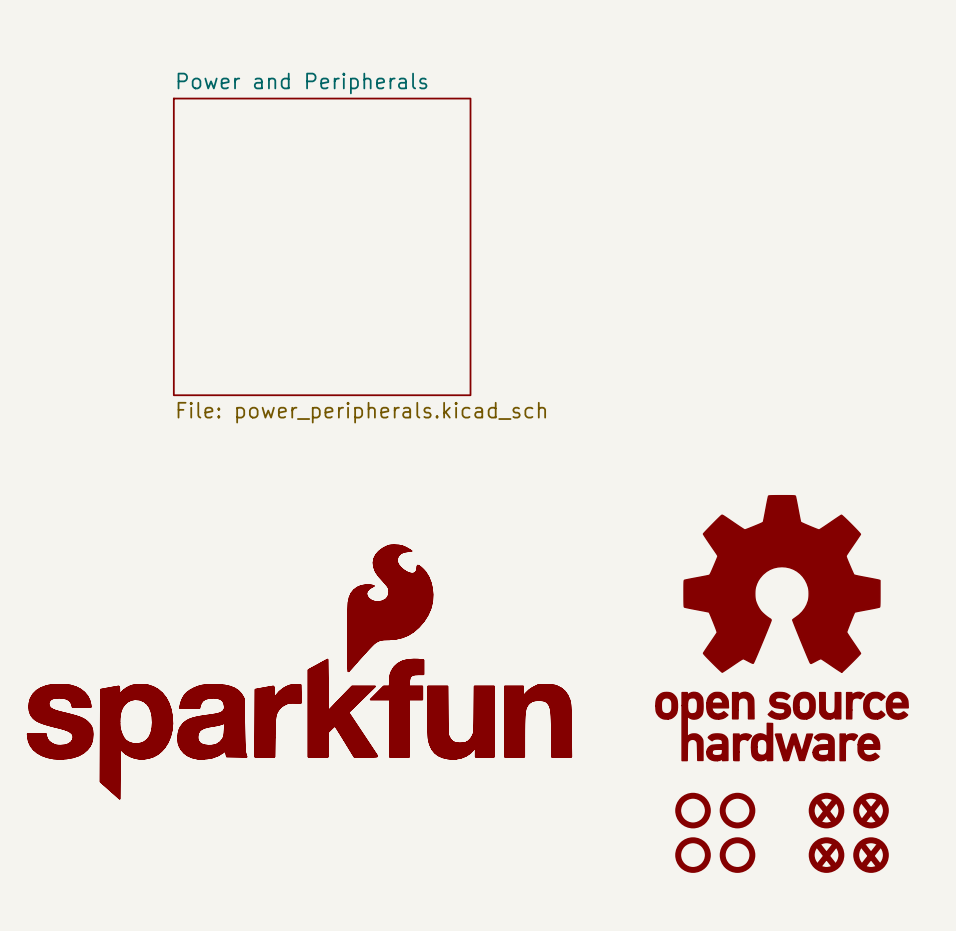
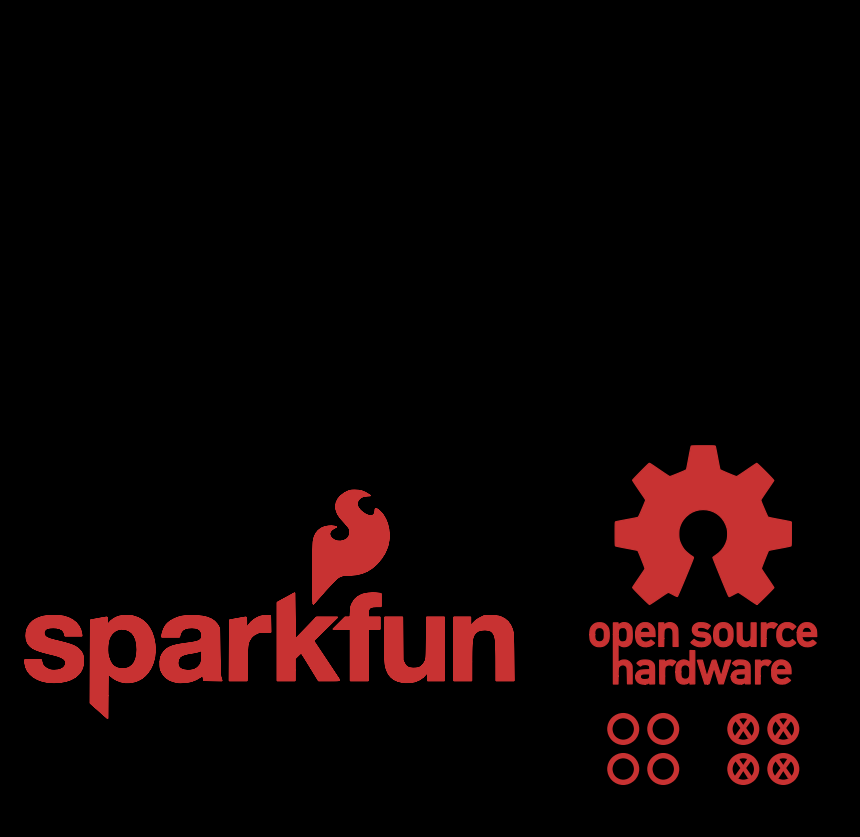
sheet Power and Peripherals: File: power_peripherals.kicad_sch (322, 246) -> none

